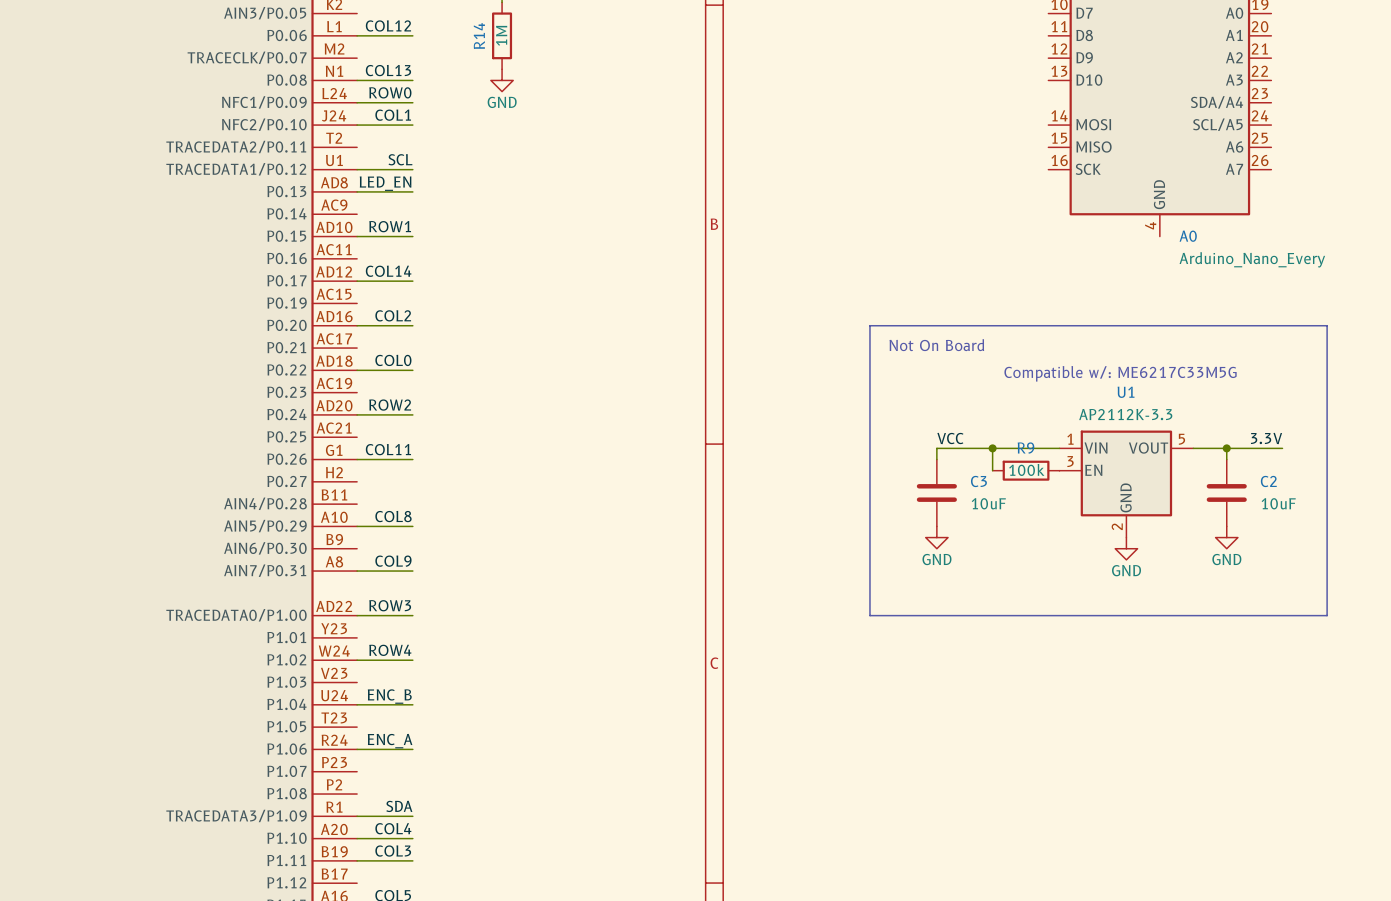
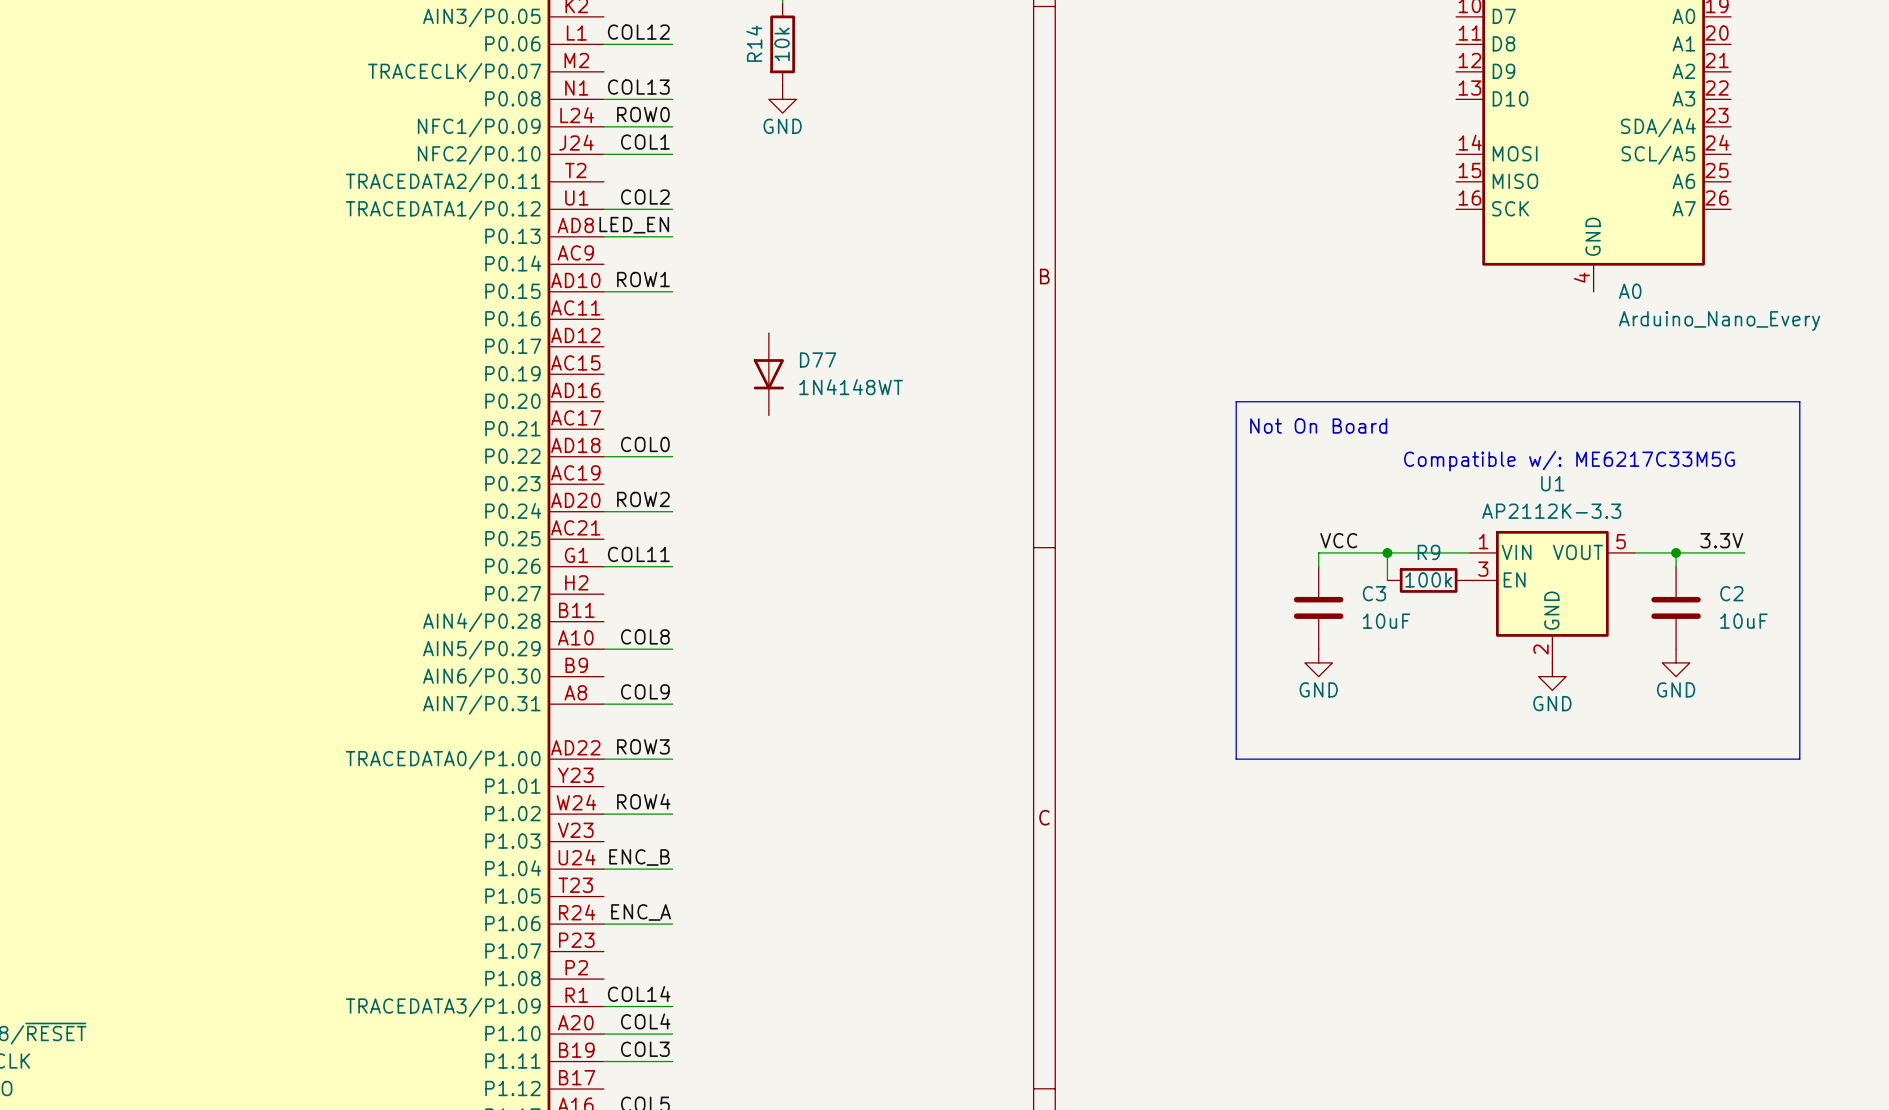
R14 value: 1M (501, 35) -> 10k (782, 44)
label: SCL (400, 159) -> COL2 (645, 197)
label: COL14 (388, 271) -> none
wire: (357, 281) (412, 281) -> none
D77: none -> 1N4148WT (768, 374)
label: COL2 (393, 315) -> none
wire: (357, 325) (412, 325) -> none
label: SDA (399, 806) -> COL14 (639, 993)

